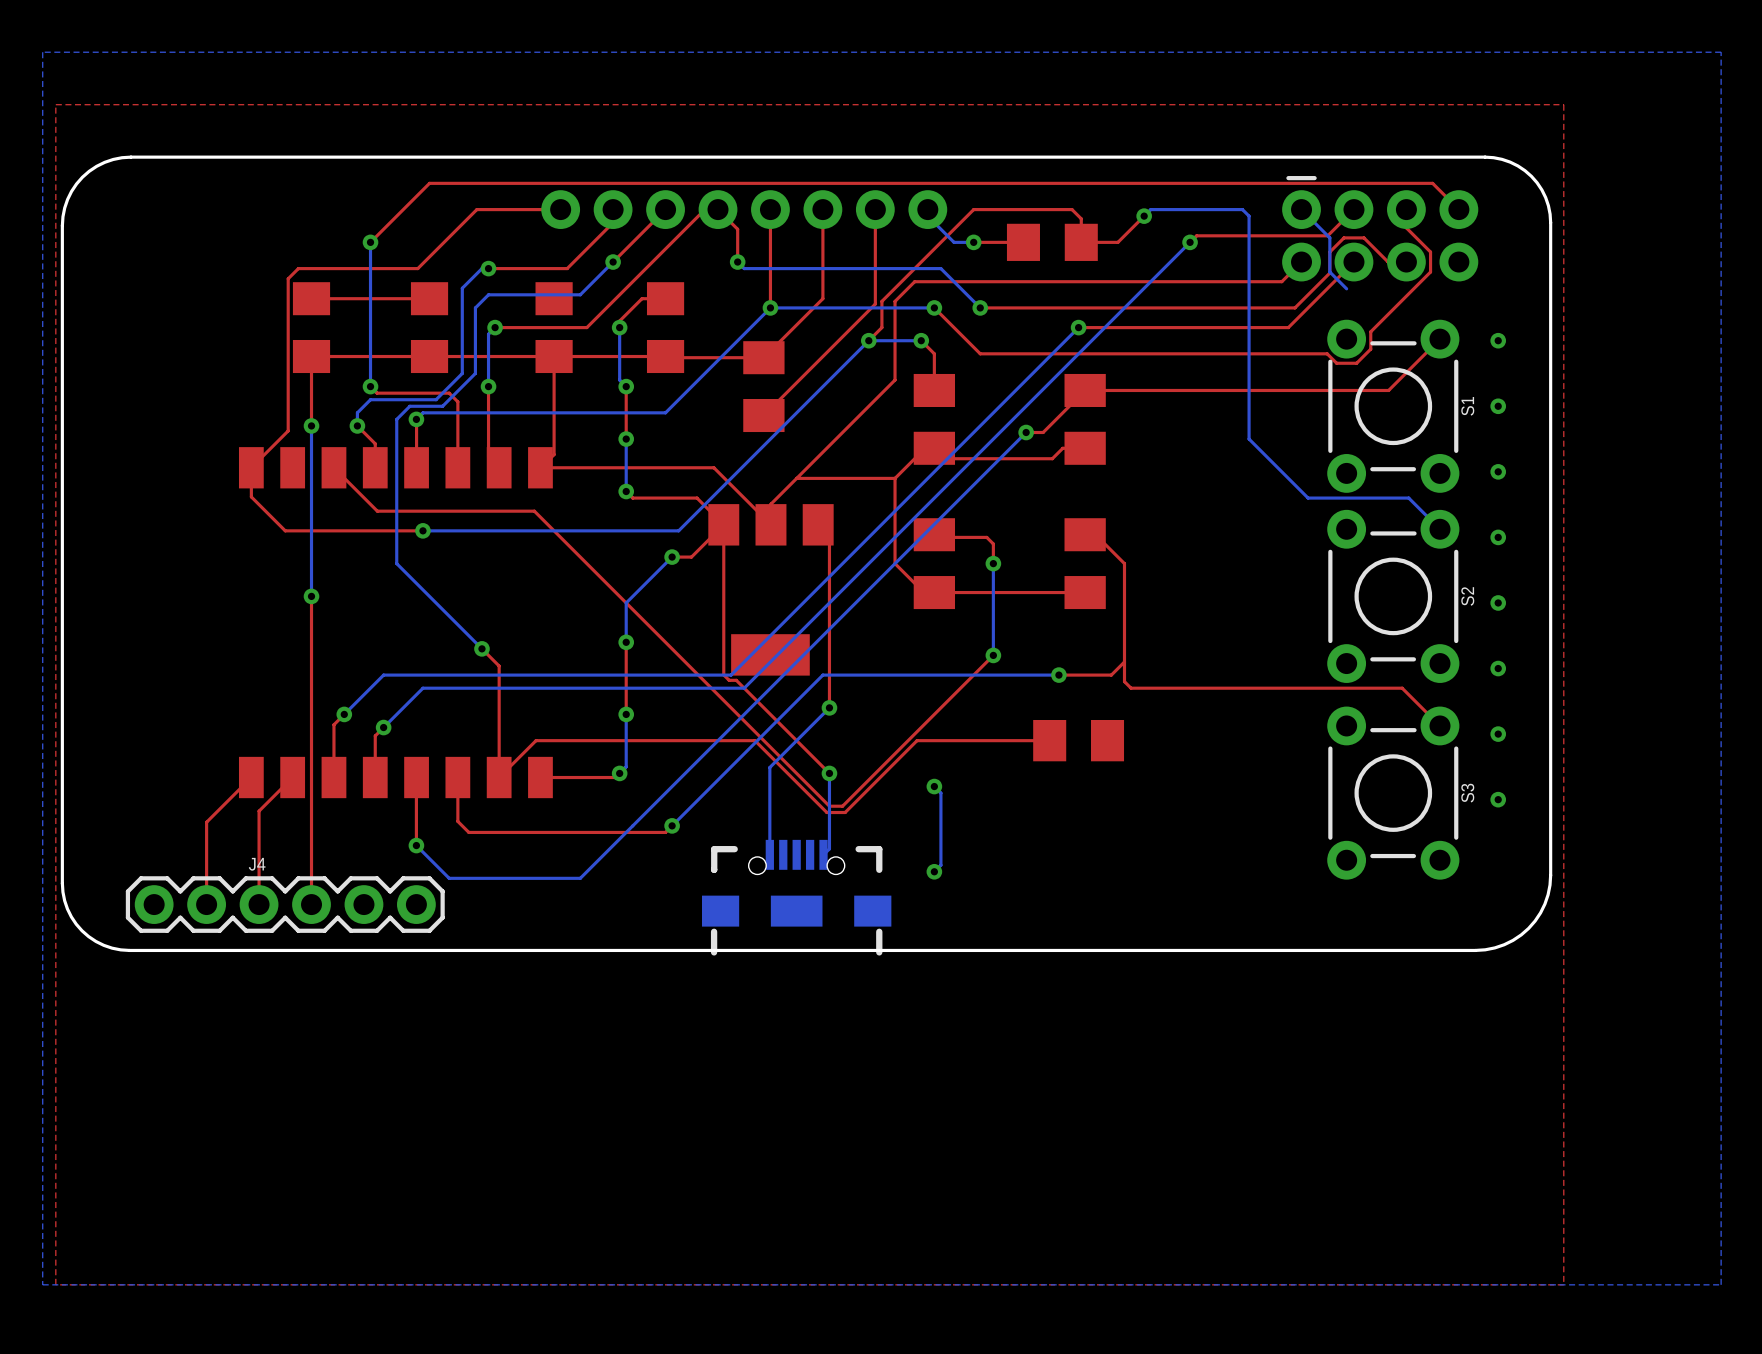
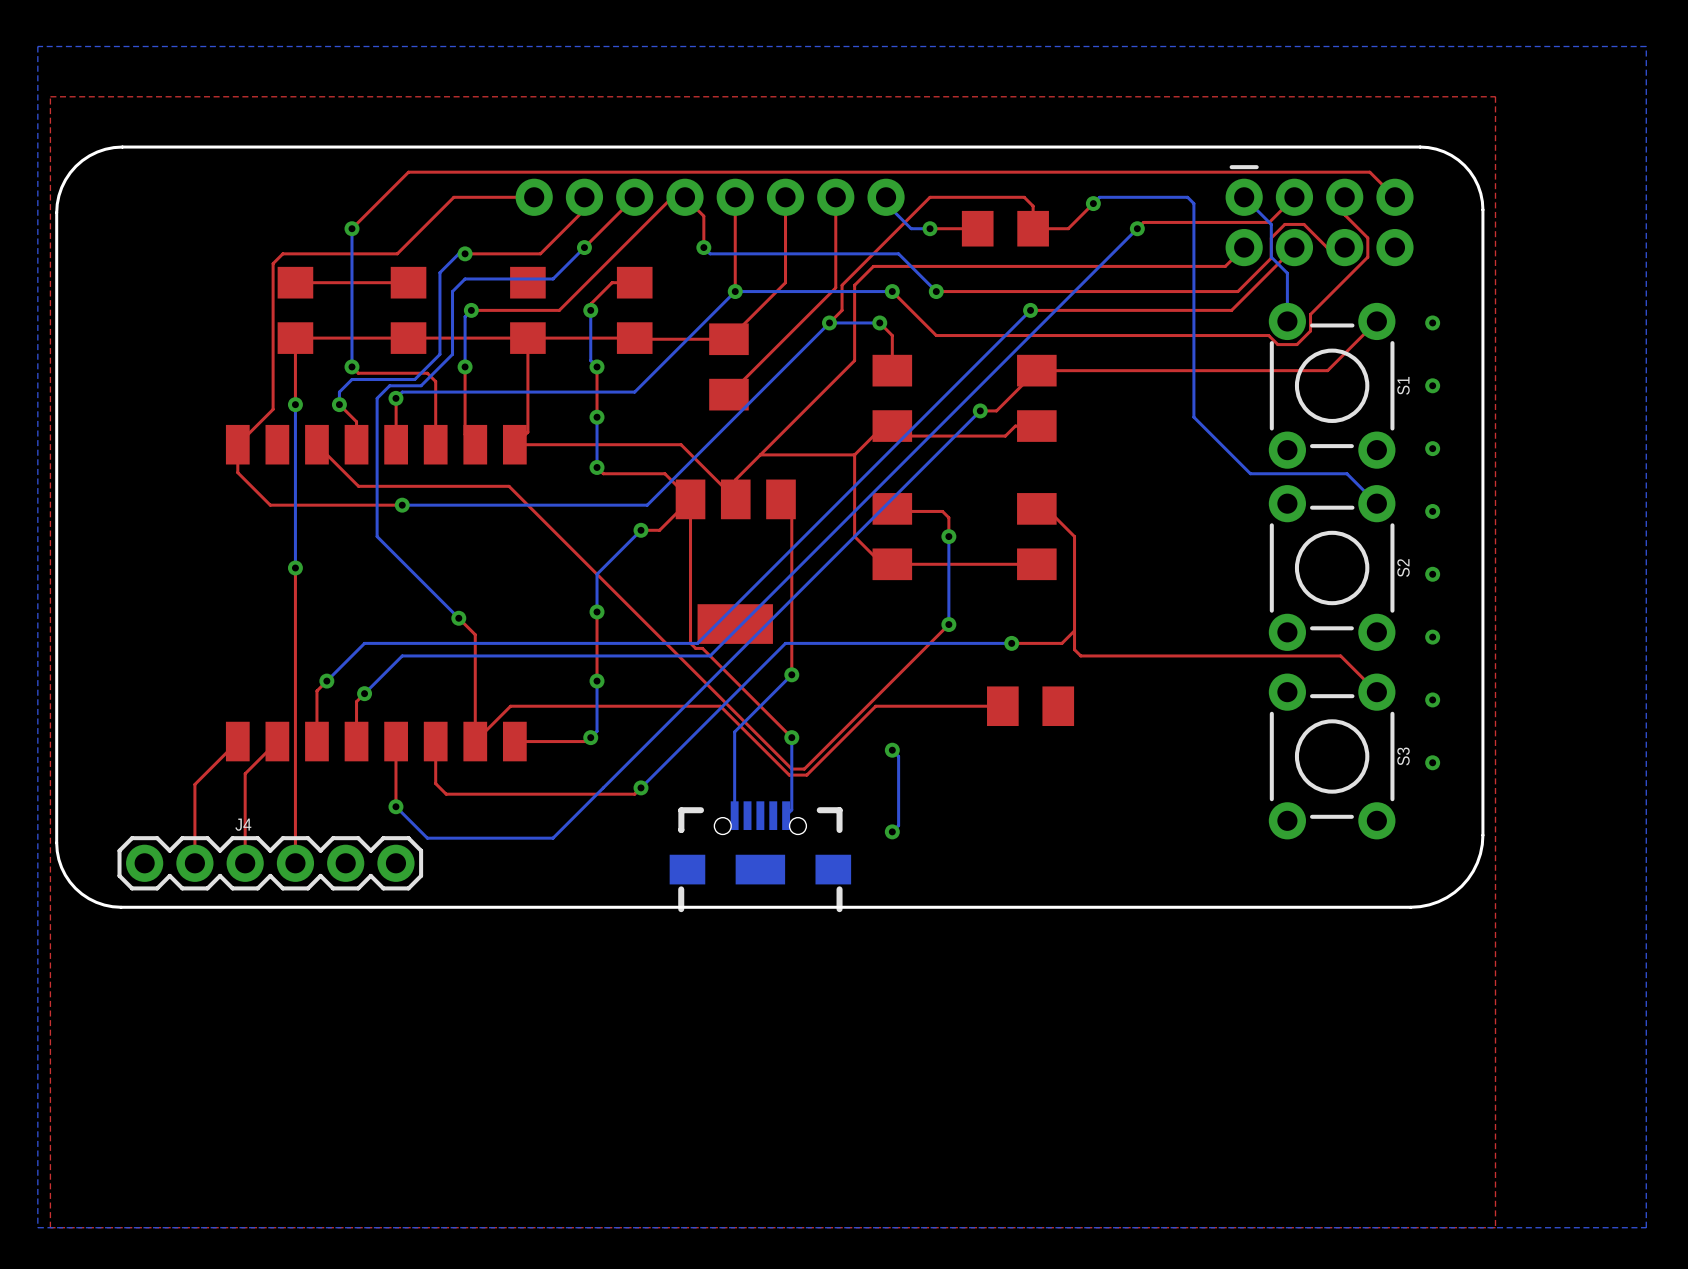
bottom track: none -> (1287, 273) (1287, 321)

